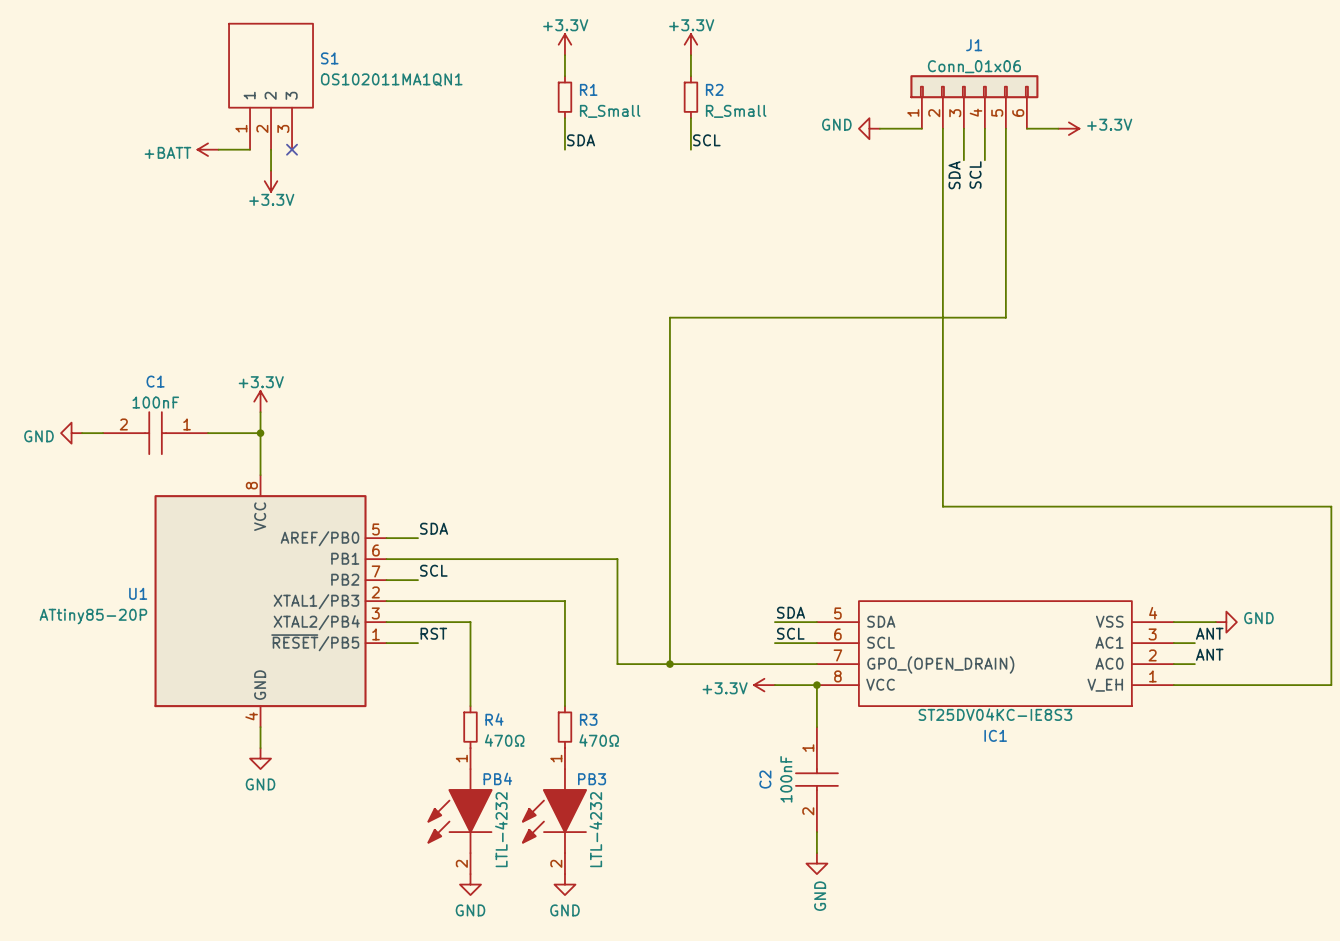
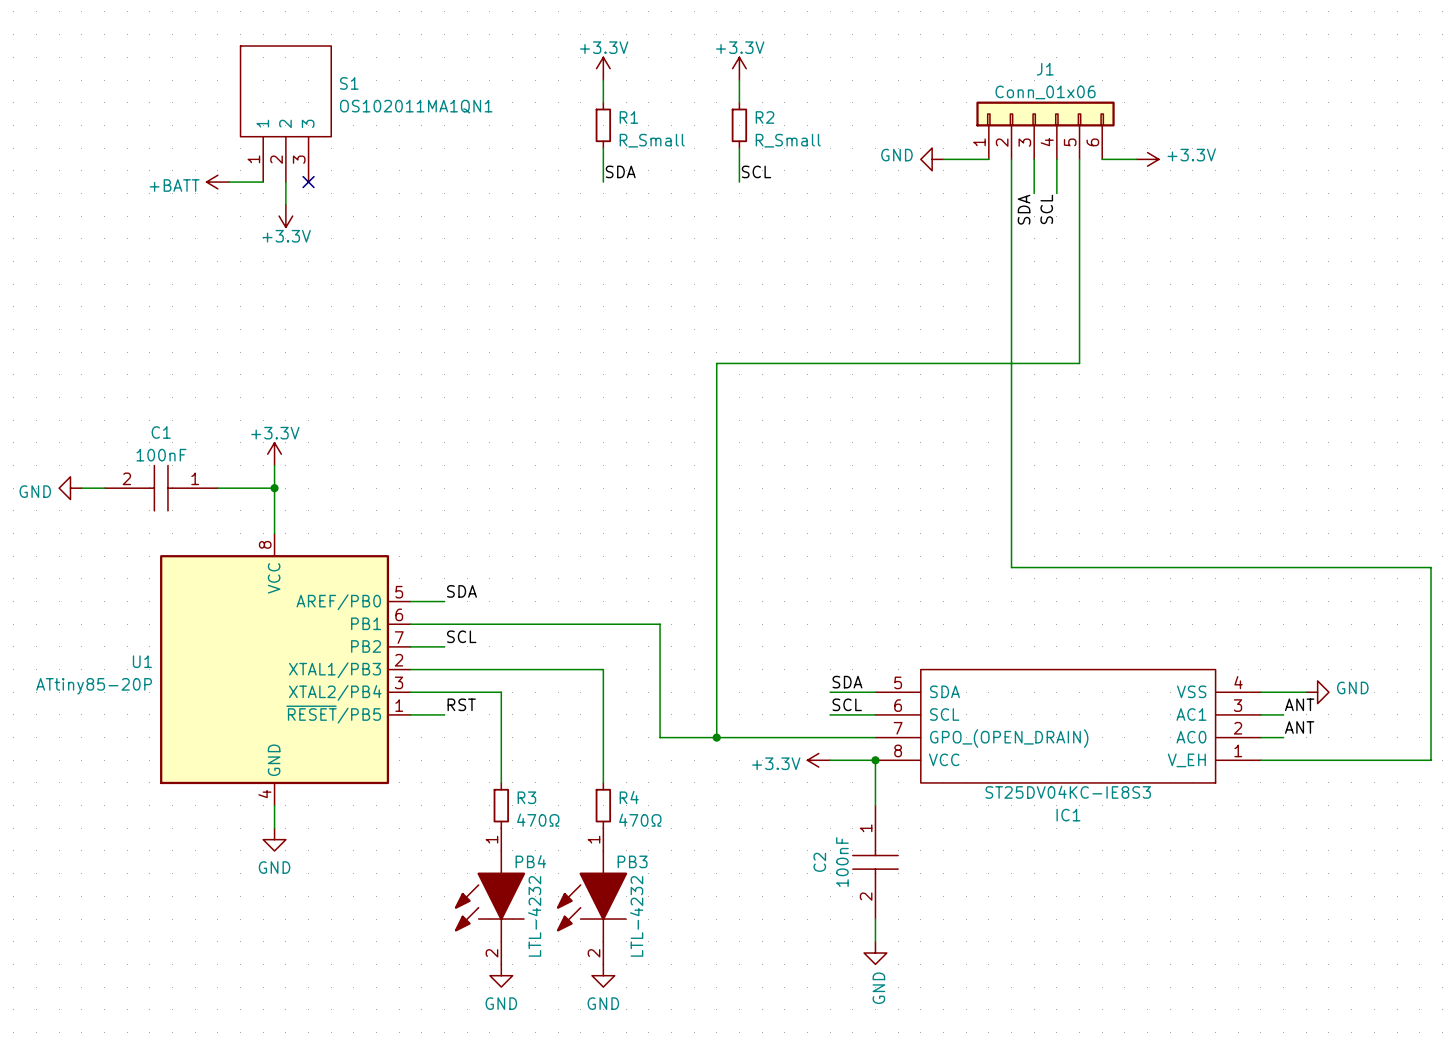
R4 name: R4 (494, 719) -> R3 (526, 797)
R3 name: R3 (588, 719) -> R4 (629, 797)

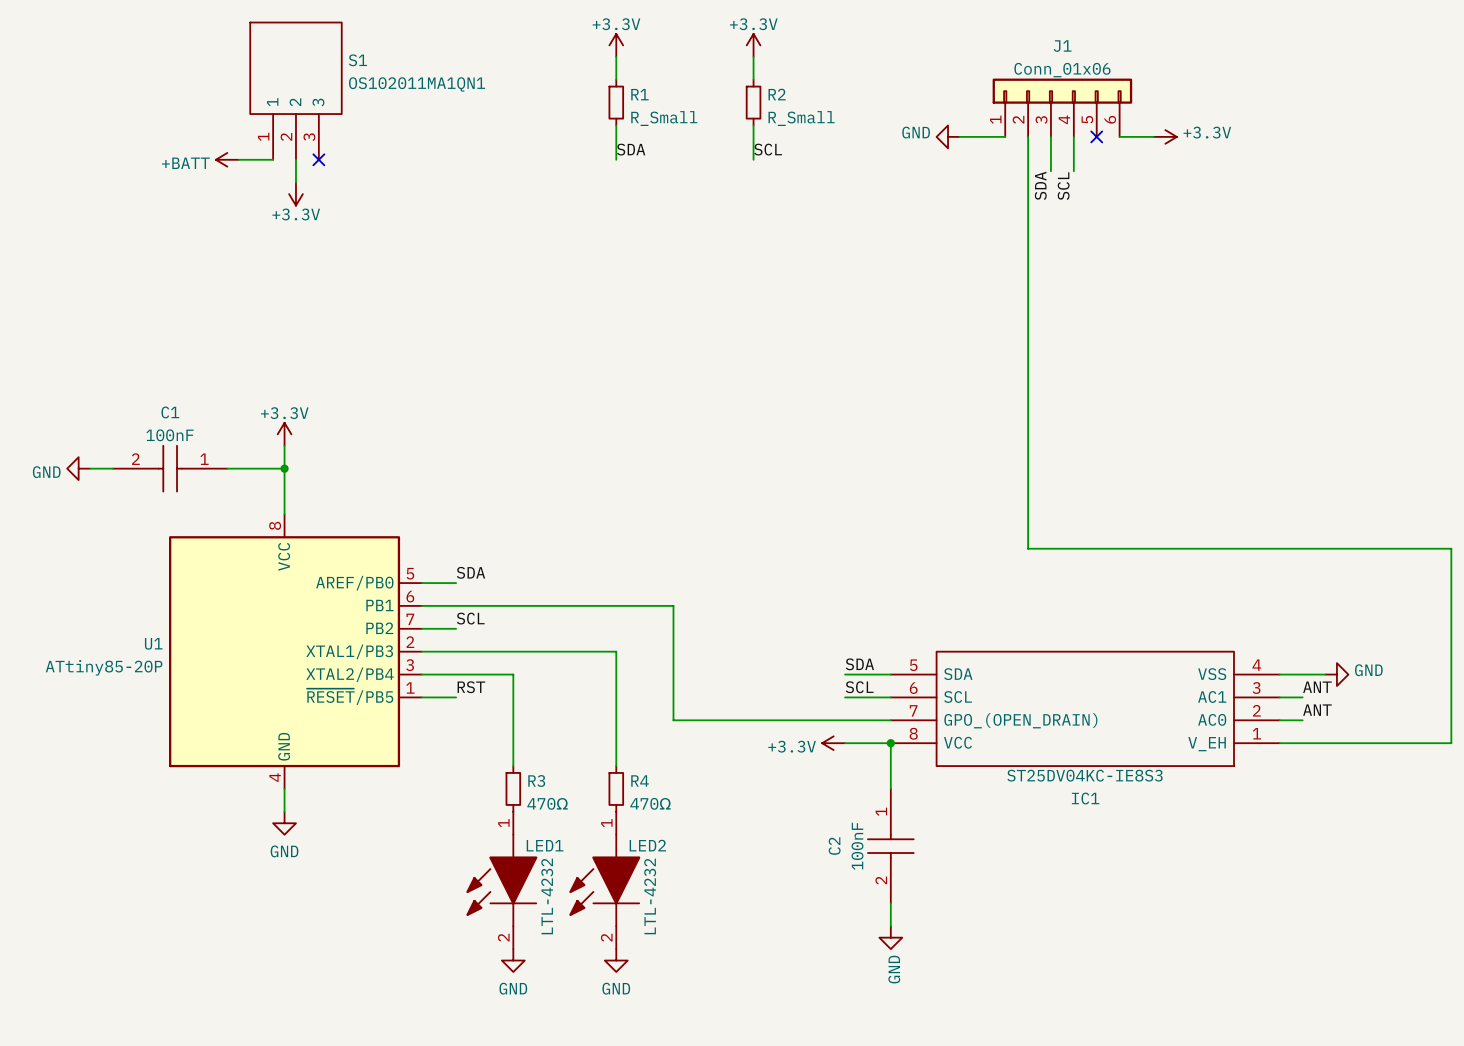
wire: (1079, 159) (1079, 363) (716, 363) (716, 737) -> none
no-connect mark: none -> (1096, 136)
junction: (716, 737) -> none
PB4 name: PB4 (530, 861) -> LED1 (545, 845)
PB3 name: PB3 (632, 861) -> LED2 (647, 845)

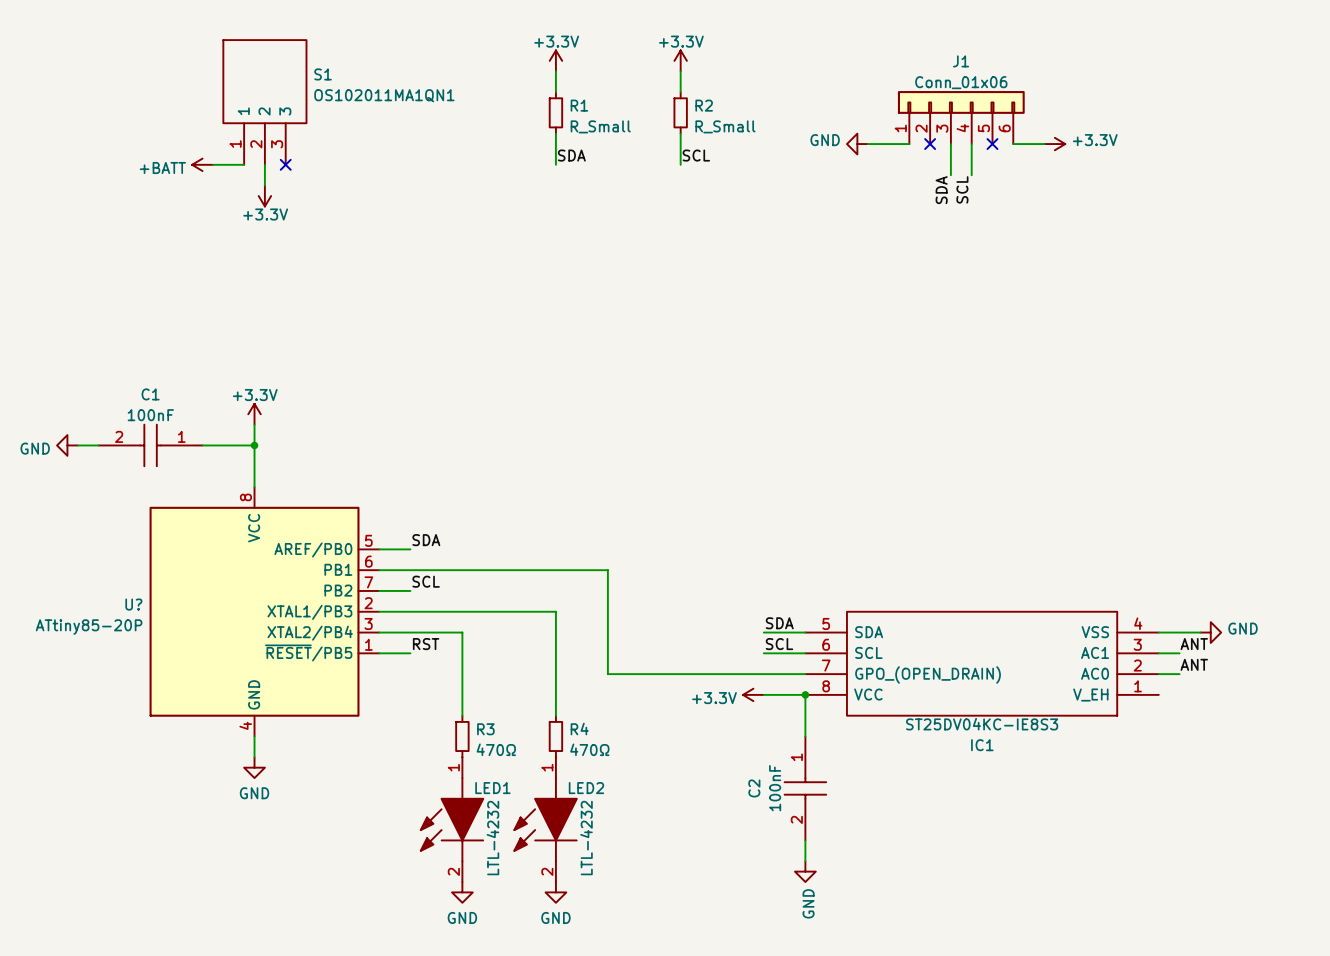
wire: (1028, 136) (1028, 548) (1451, 548) (1451, 743) (1279, 743) -> none
no-connect mark: none -> (930, 144)
U1 name: U1 (153, 643) -> U? (133, 604)

